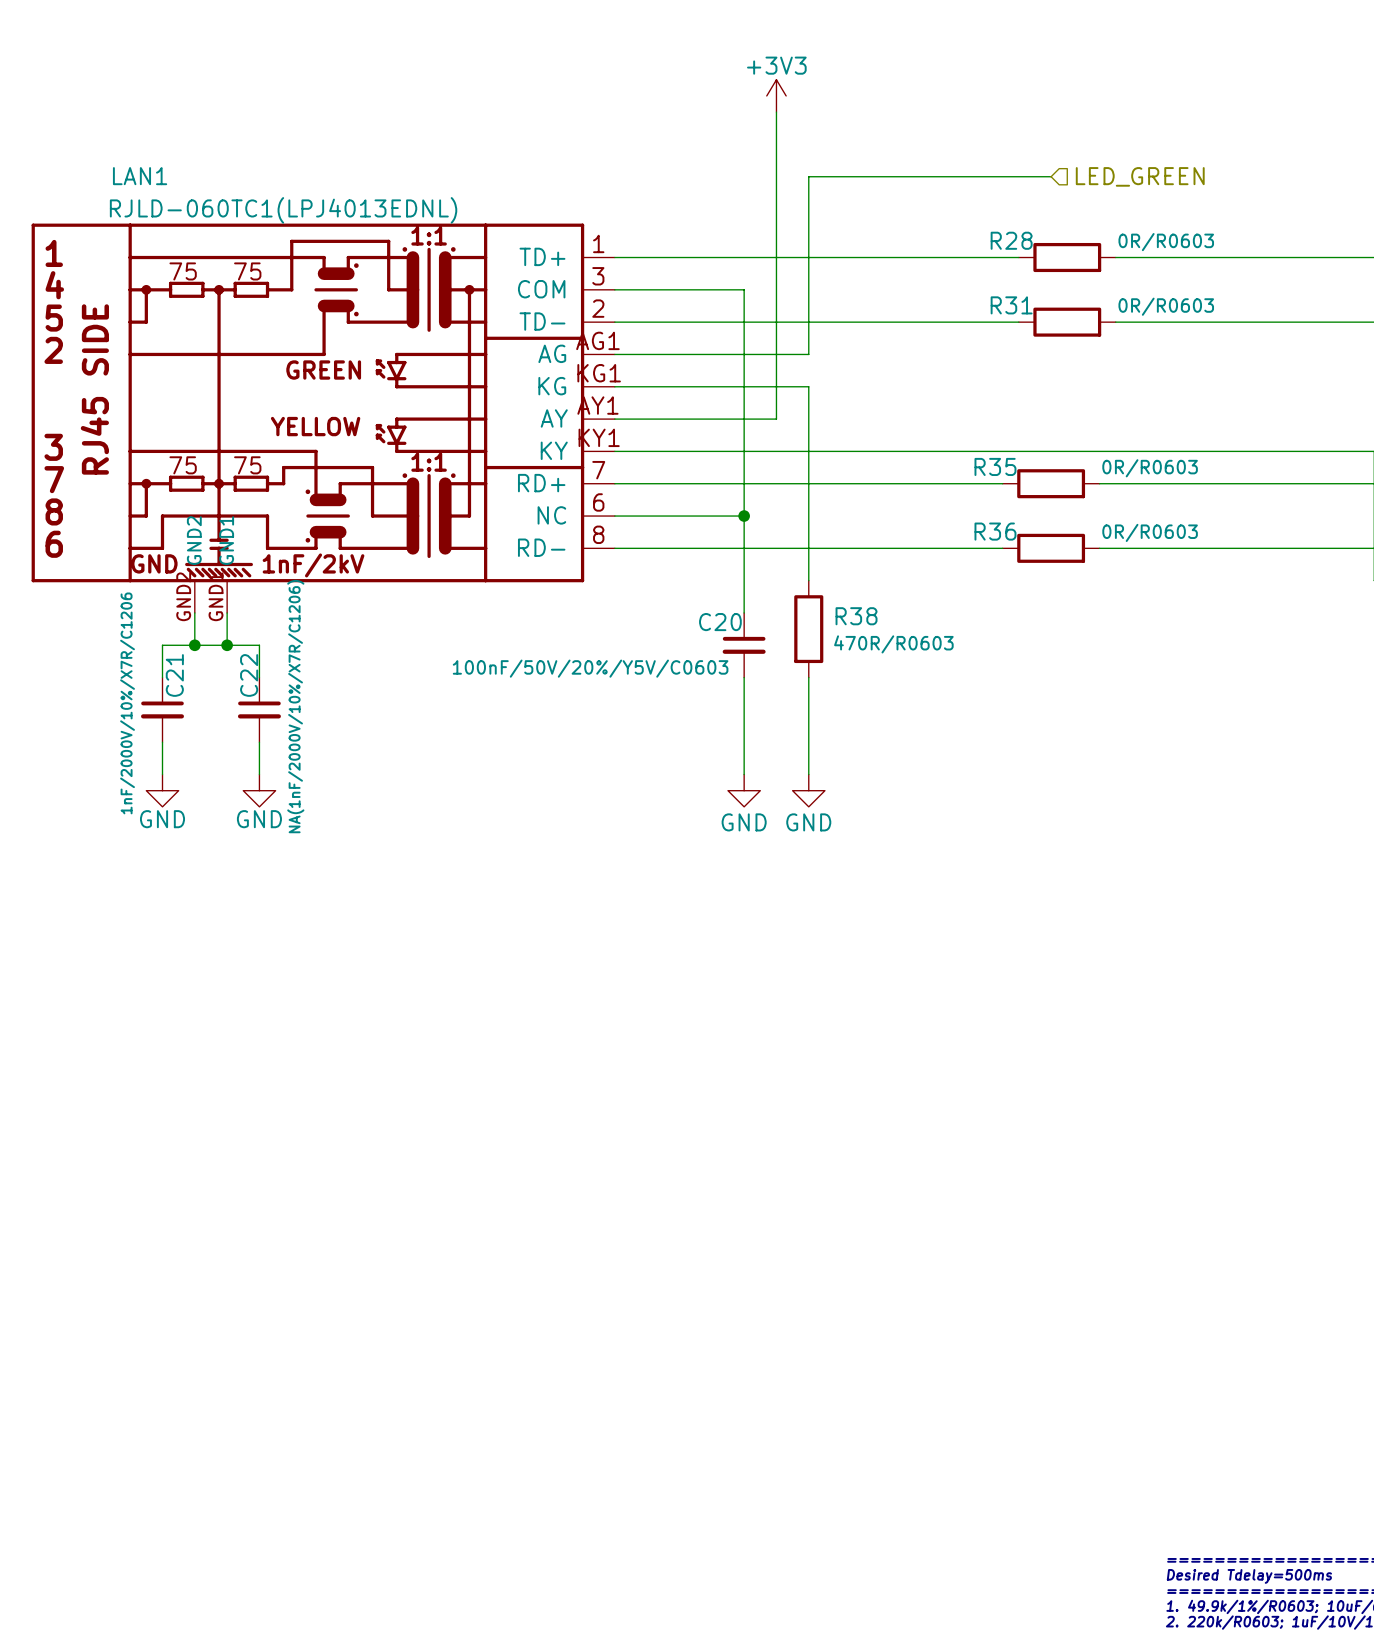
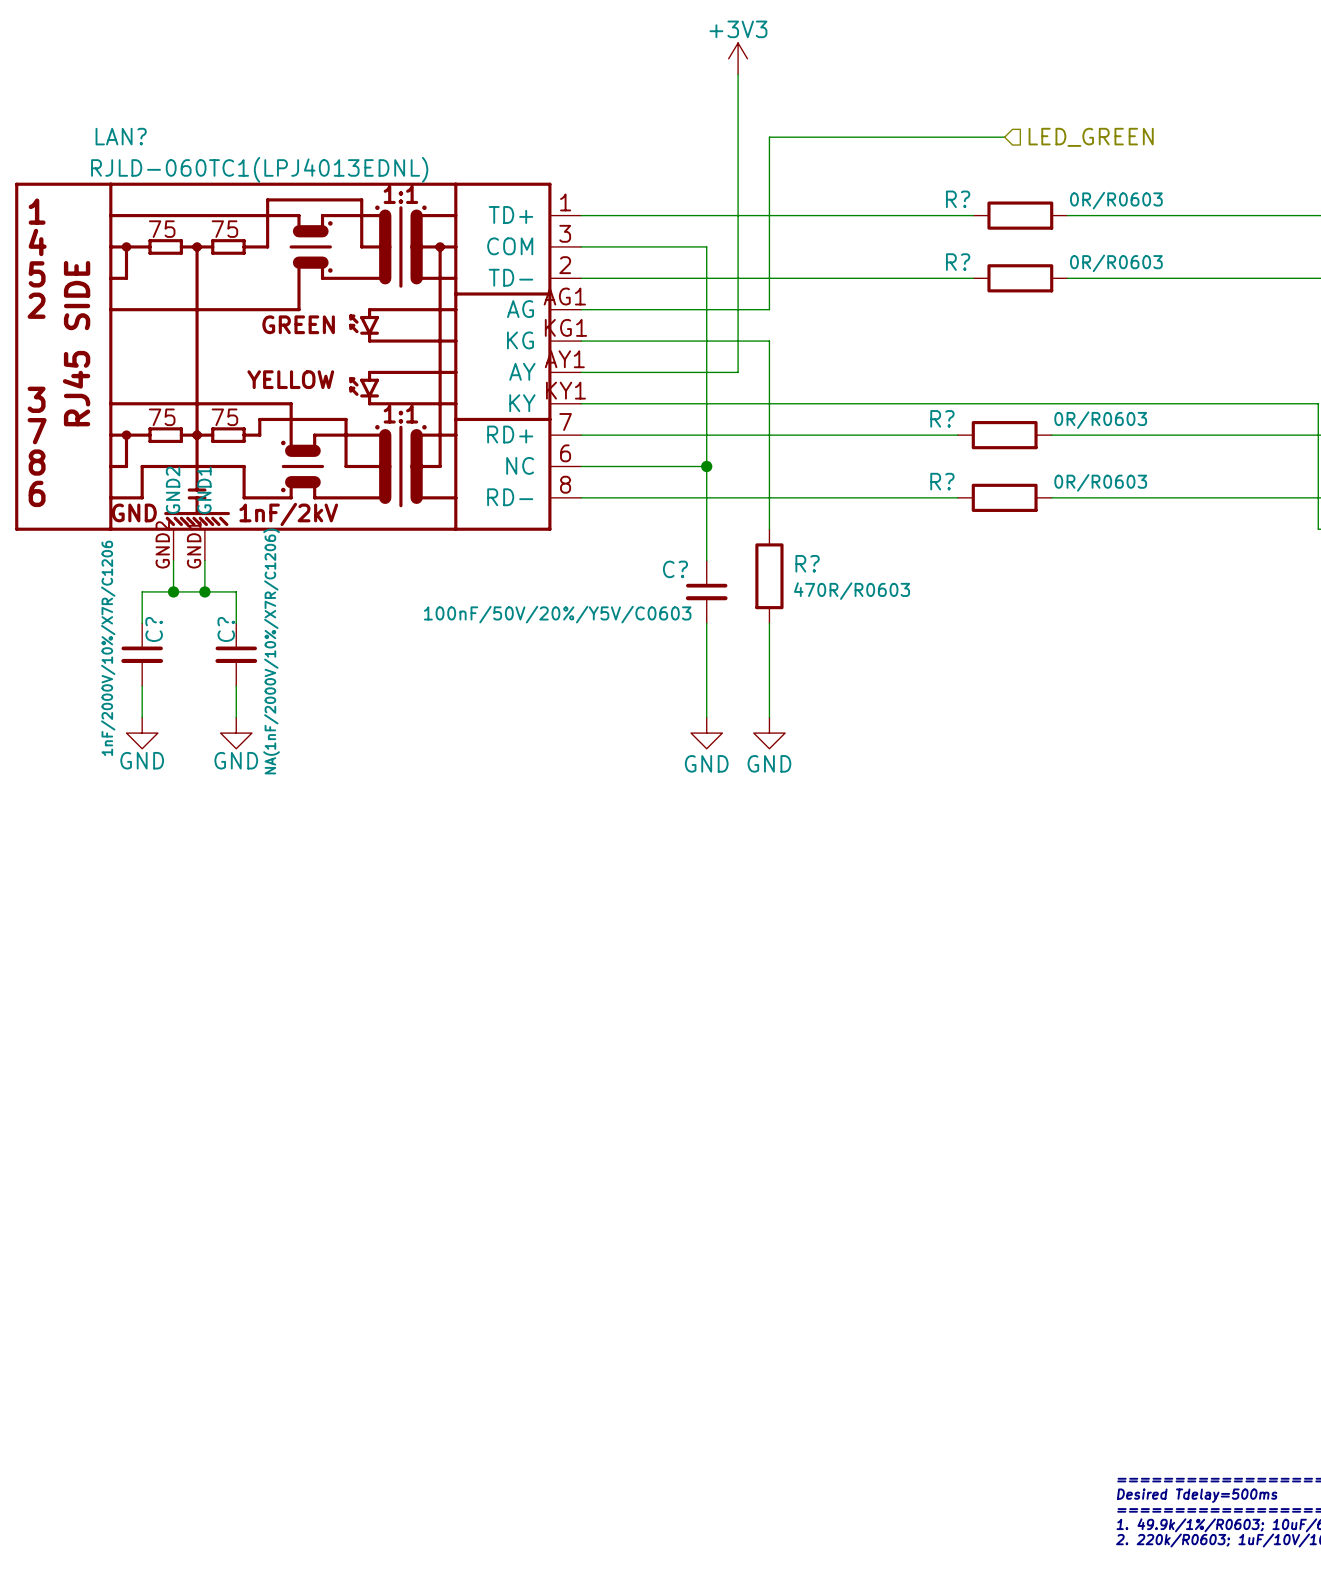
LAN1 name: LAN1 (140, 176) -> LAN? (121, 136)
R28 name: R28 (1011, 240) -> R? (958, 199)
R31 name: R31 (1011, 305) -> R? (958, 262)
R35 name: R35 (995, 466) -> R? (942, 418)
R36 name: R36 (995, 531) -> R? (942, 481)
R38 name: R38 (856, 616) -> R? (807, 563)
C20 name: C20 (720, 622) -> C? (675, 569)
C21 name: C21 (174, 675) -> C? (154, 629)
C22 name: C22 (249, 675) -> C? (226, 629)

